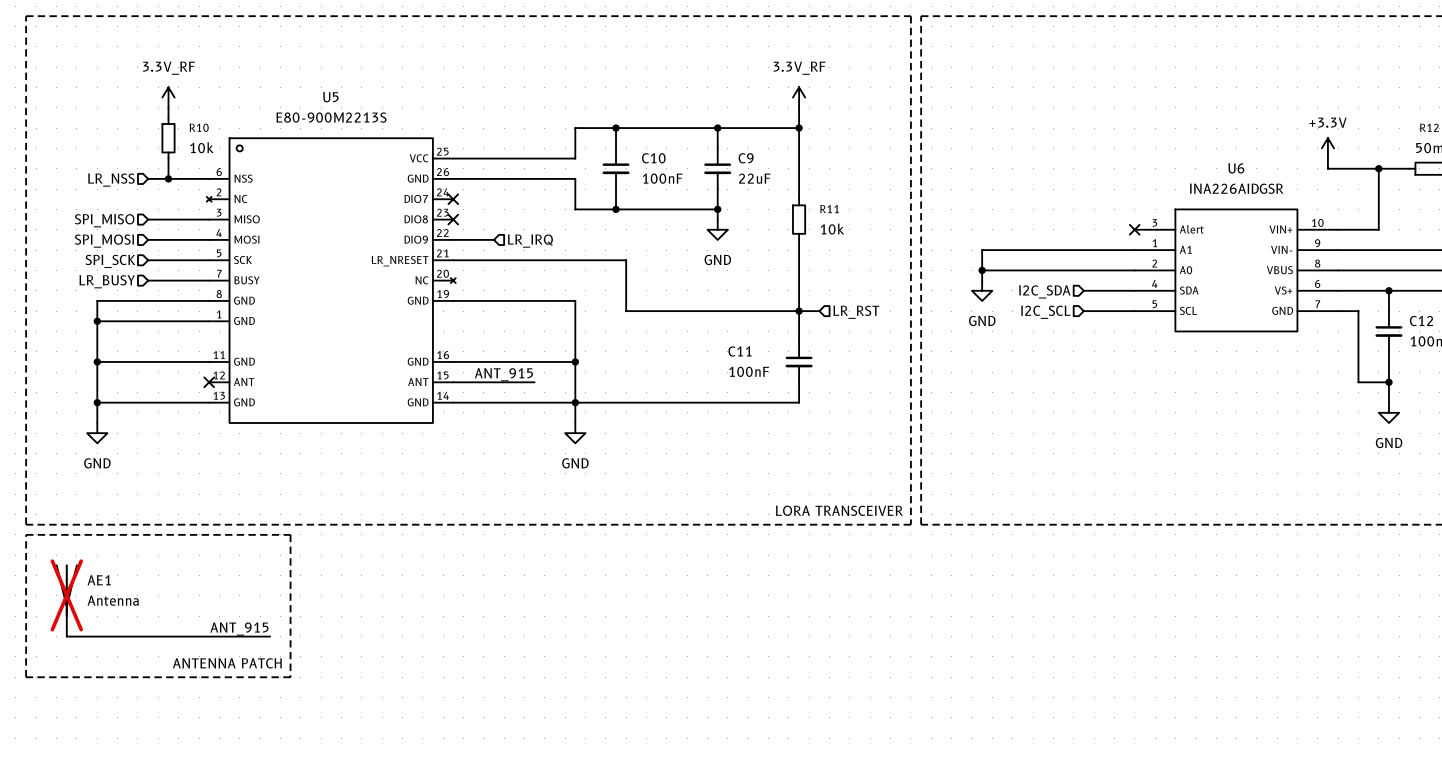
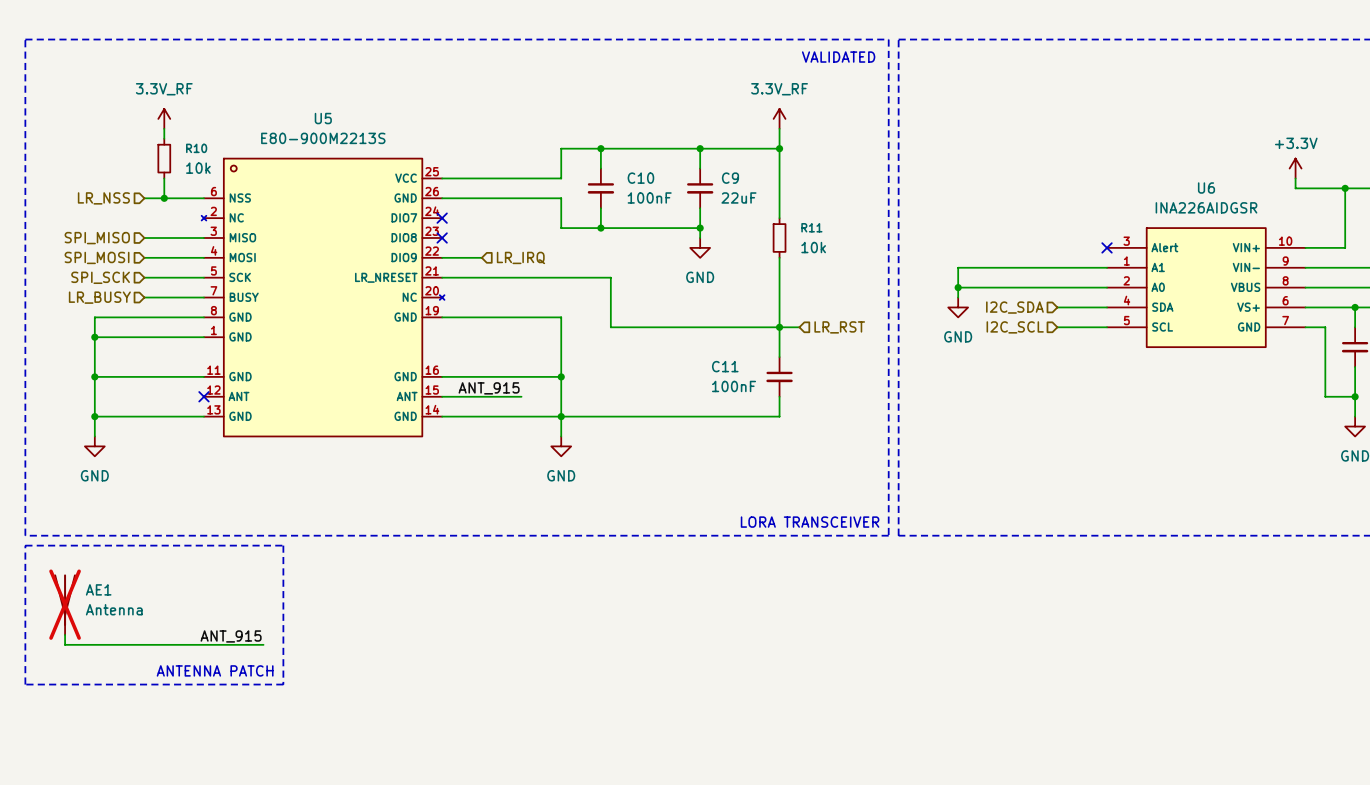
text: none -> VALIDATED (838, 57)

